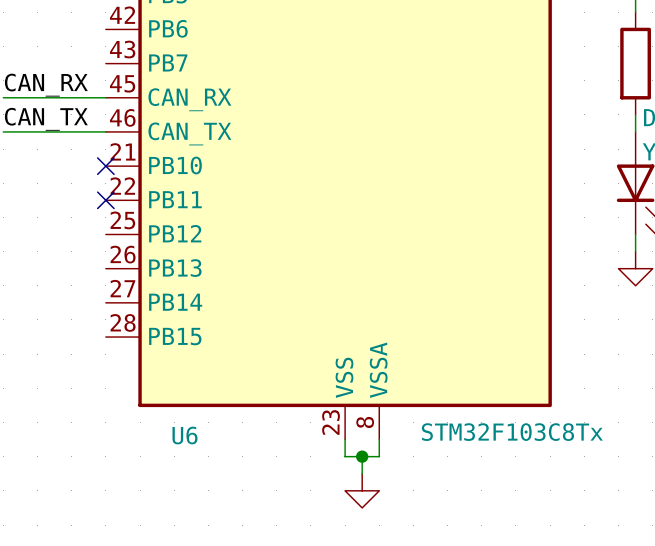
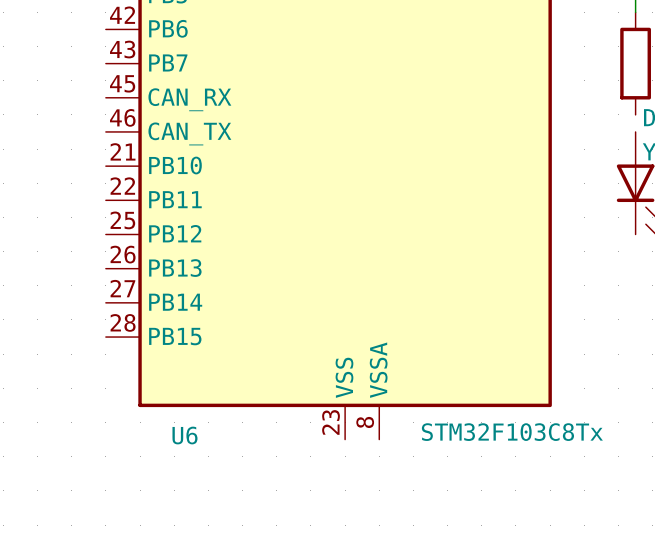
label: CAN_RX (46, 85) -> none
wire: (3, 97) (105, 97) -> none
wire: (635, 114) (635, 131) -> none
label: CAN_TX (46, 119) -> none
wire: (3, 131) (105, 131) -> none
no-connect mark: (105, 166) -> none
no-connect mark: (105, 200) -> none
wire: (635, 234) (635, 251) -> none
power symbol: (635, 268) -> none
wire: (345, 439) (345, 456) (379, 456) (379, 439) -> none
wire: (362, 456) (362, 473) -> none
junction: (362, 456) -> none
power symbol: (362, 490) -> none

